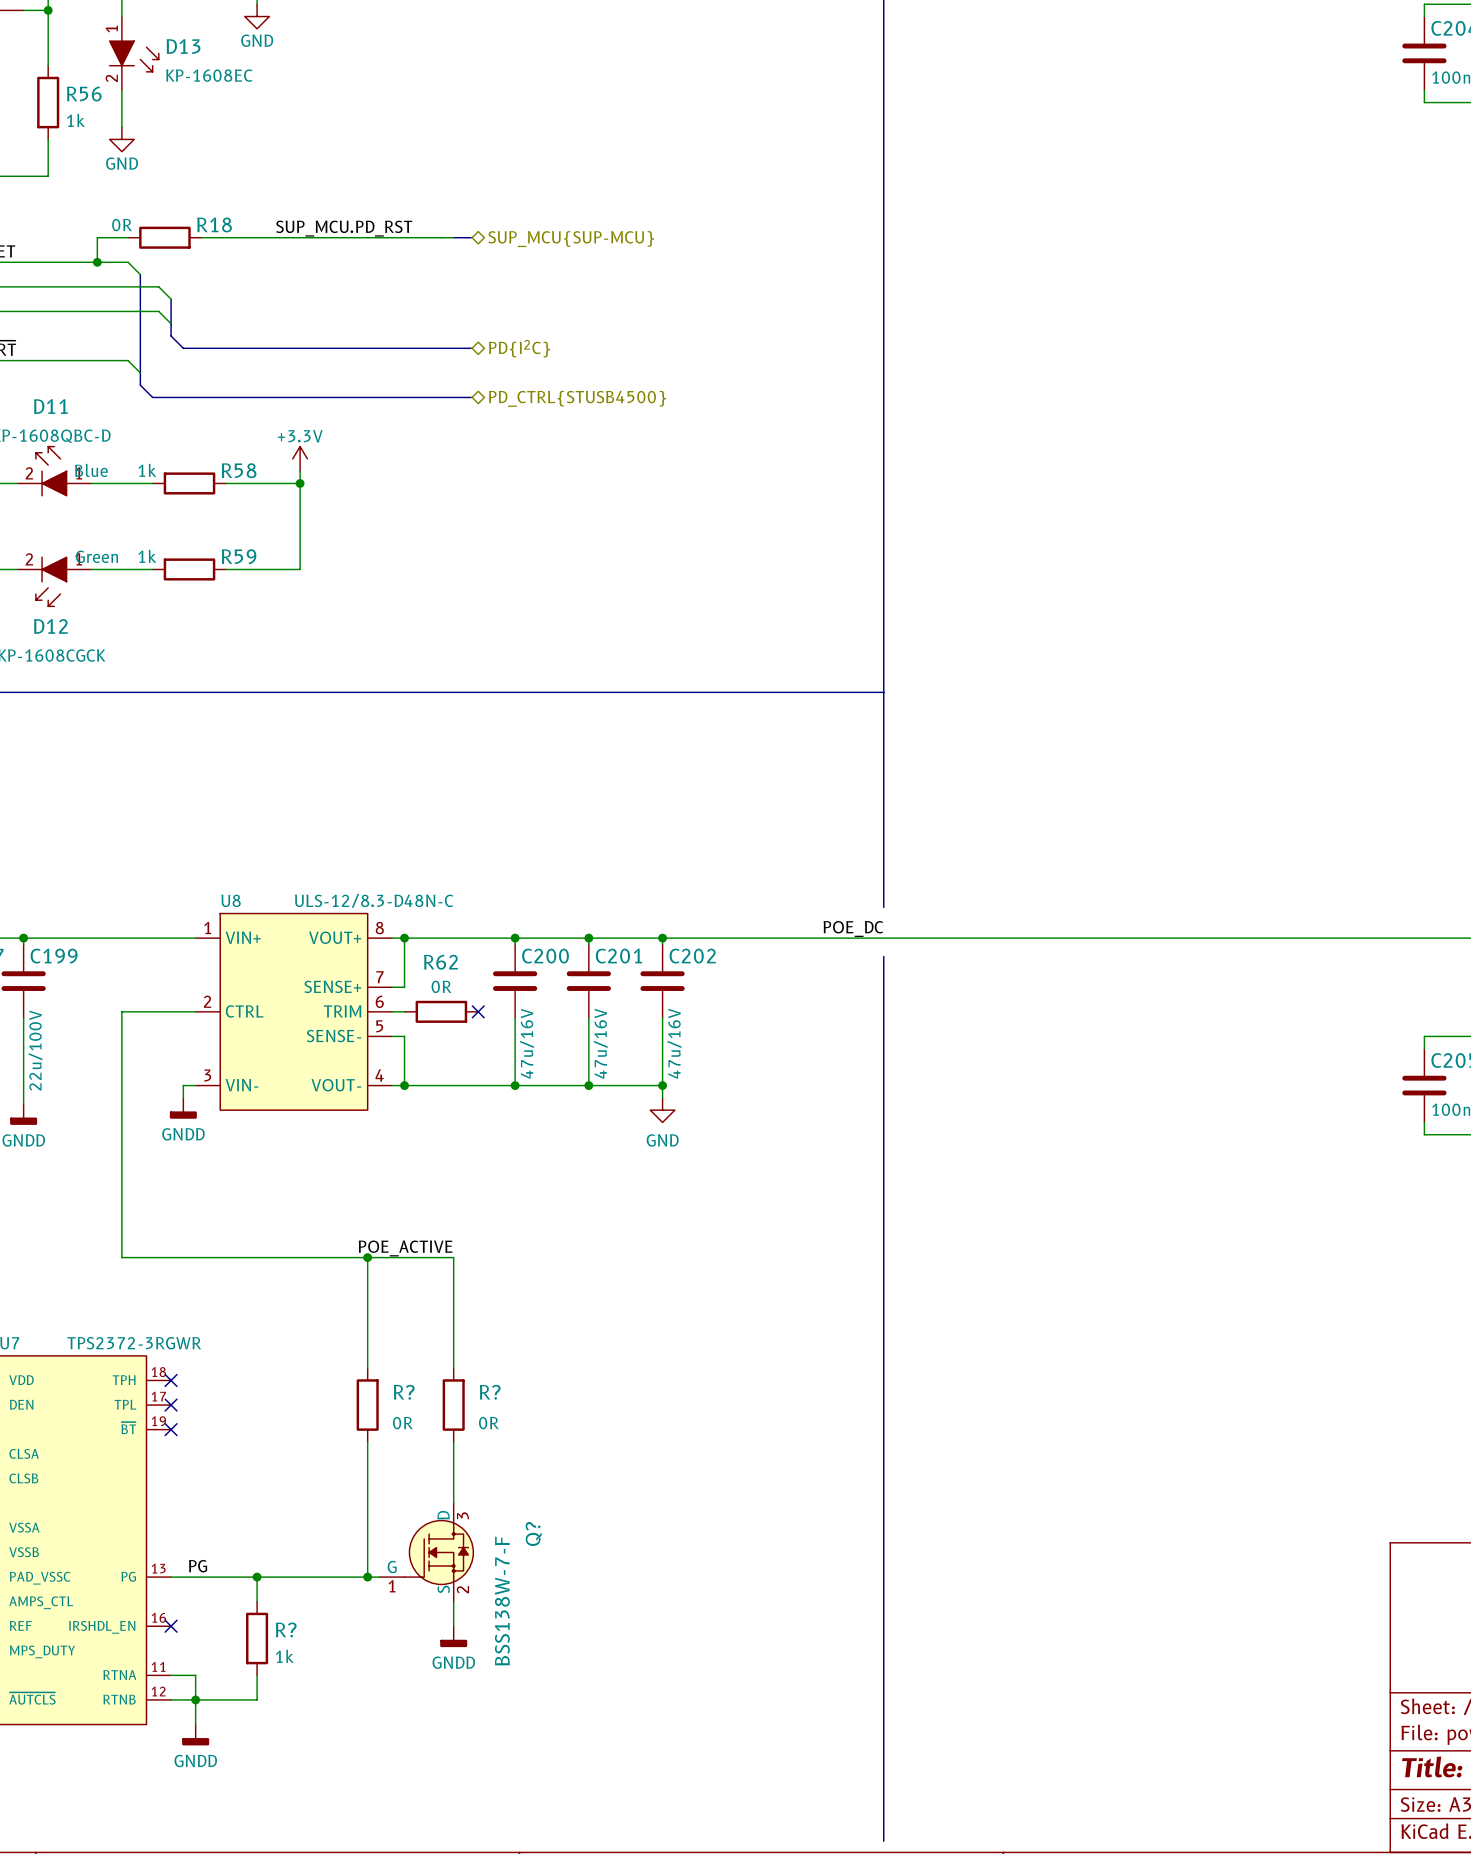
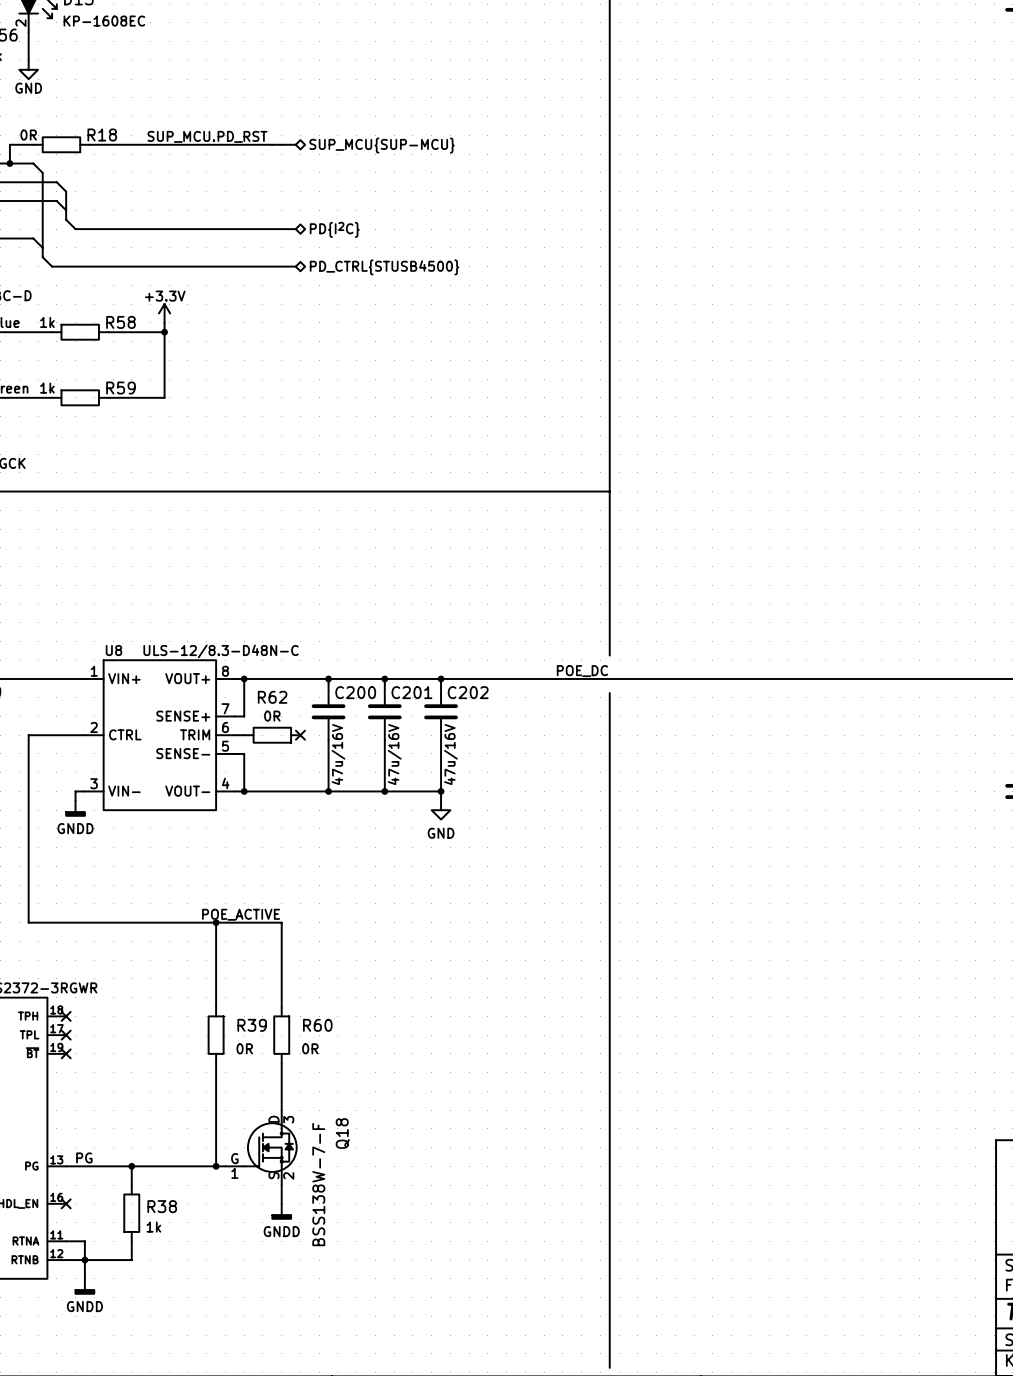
R? name: R? (404, 1392) -> R39 (252, 1025)
R? name: R? (490, 1392) -> R60 (317, 1025)
Q? name: Q? (533, 1533) -> Q18 (342, 1133)
R? name: R? (286, 1629) -> R38 (162, 1206)

